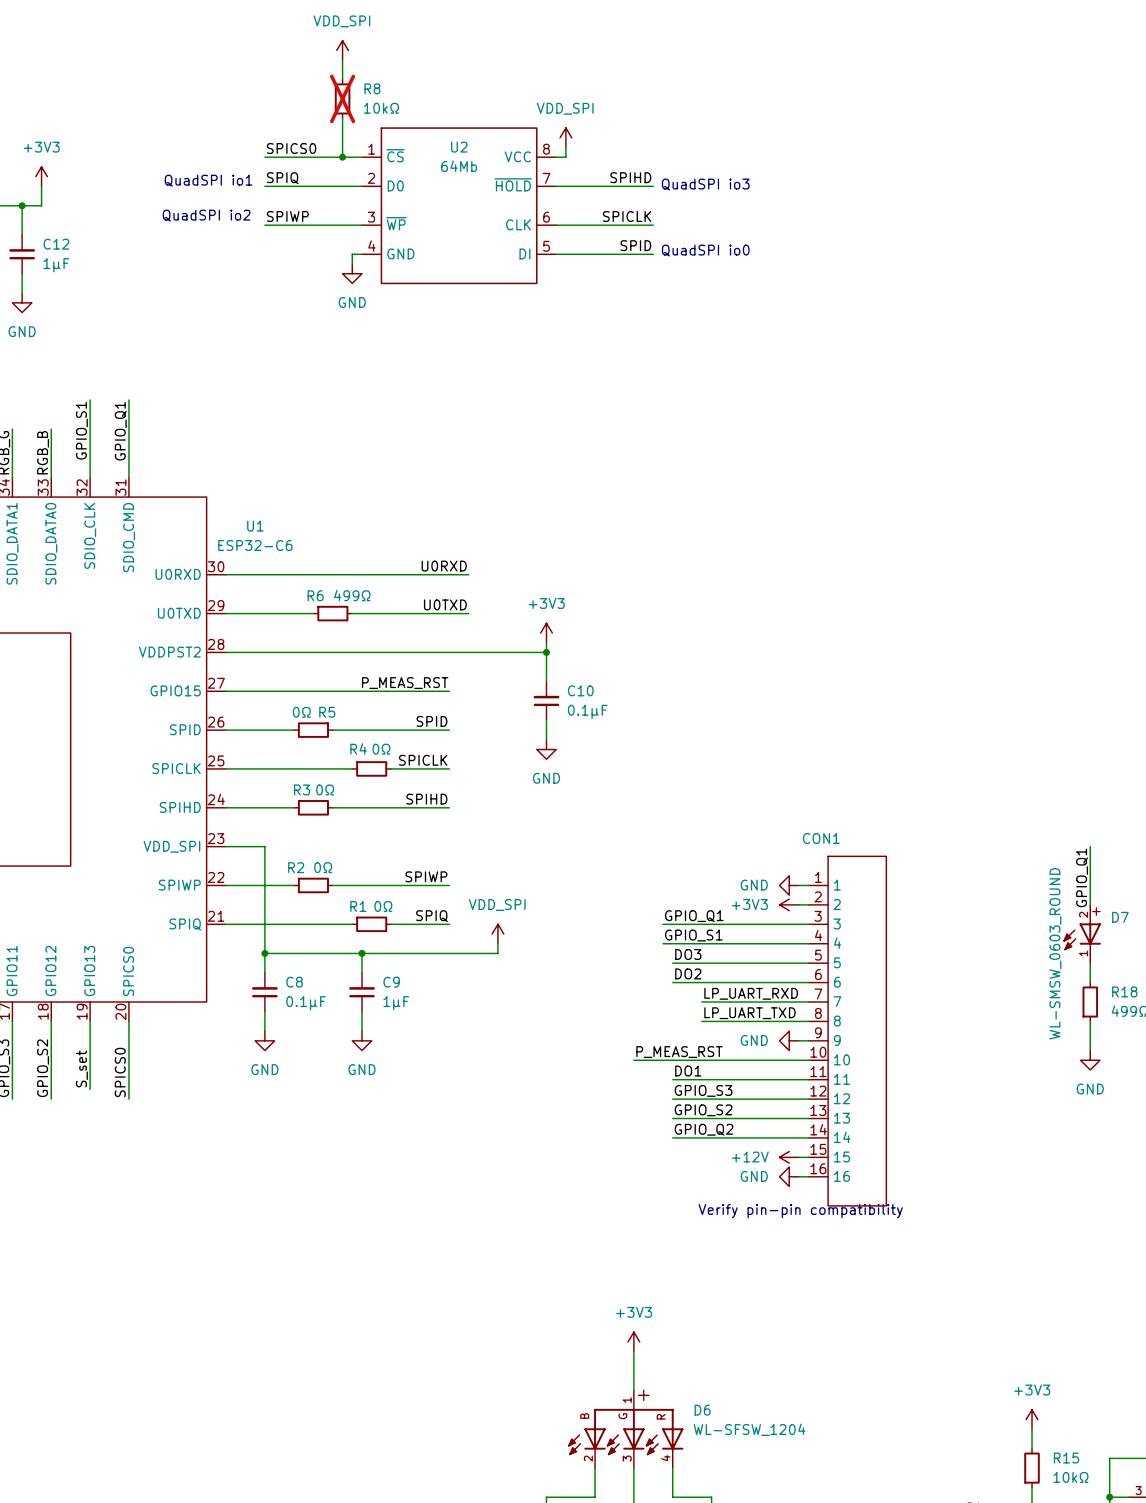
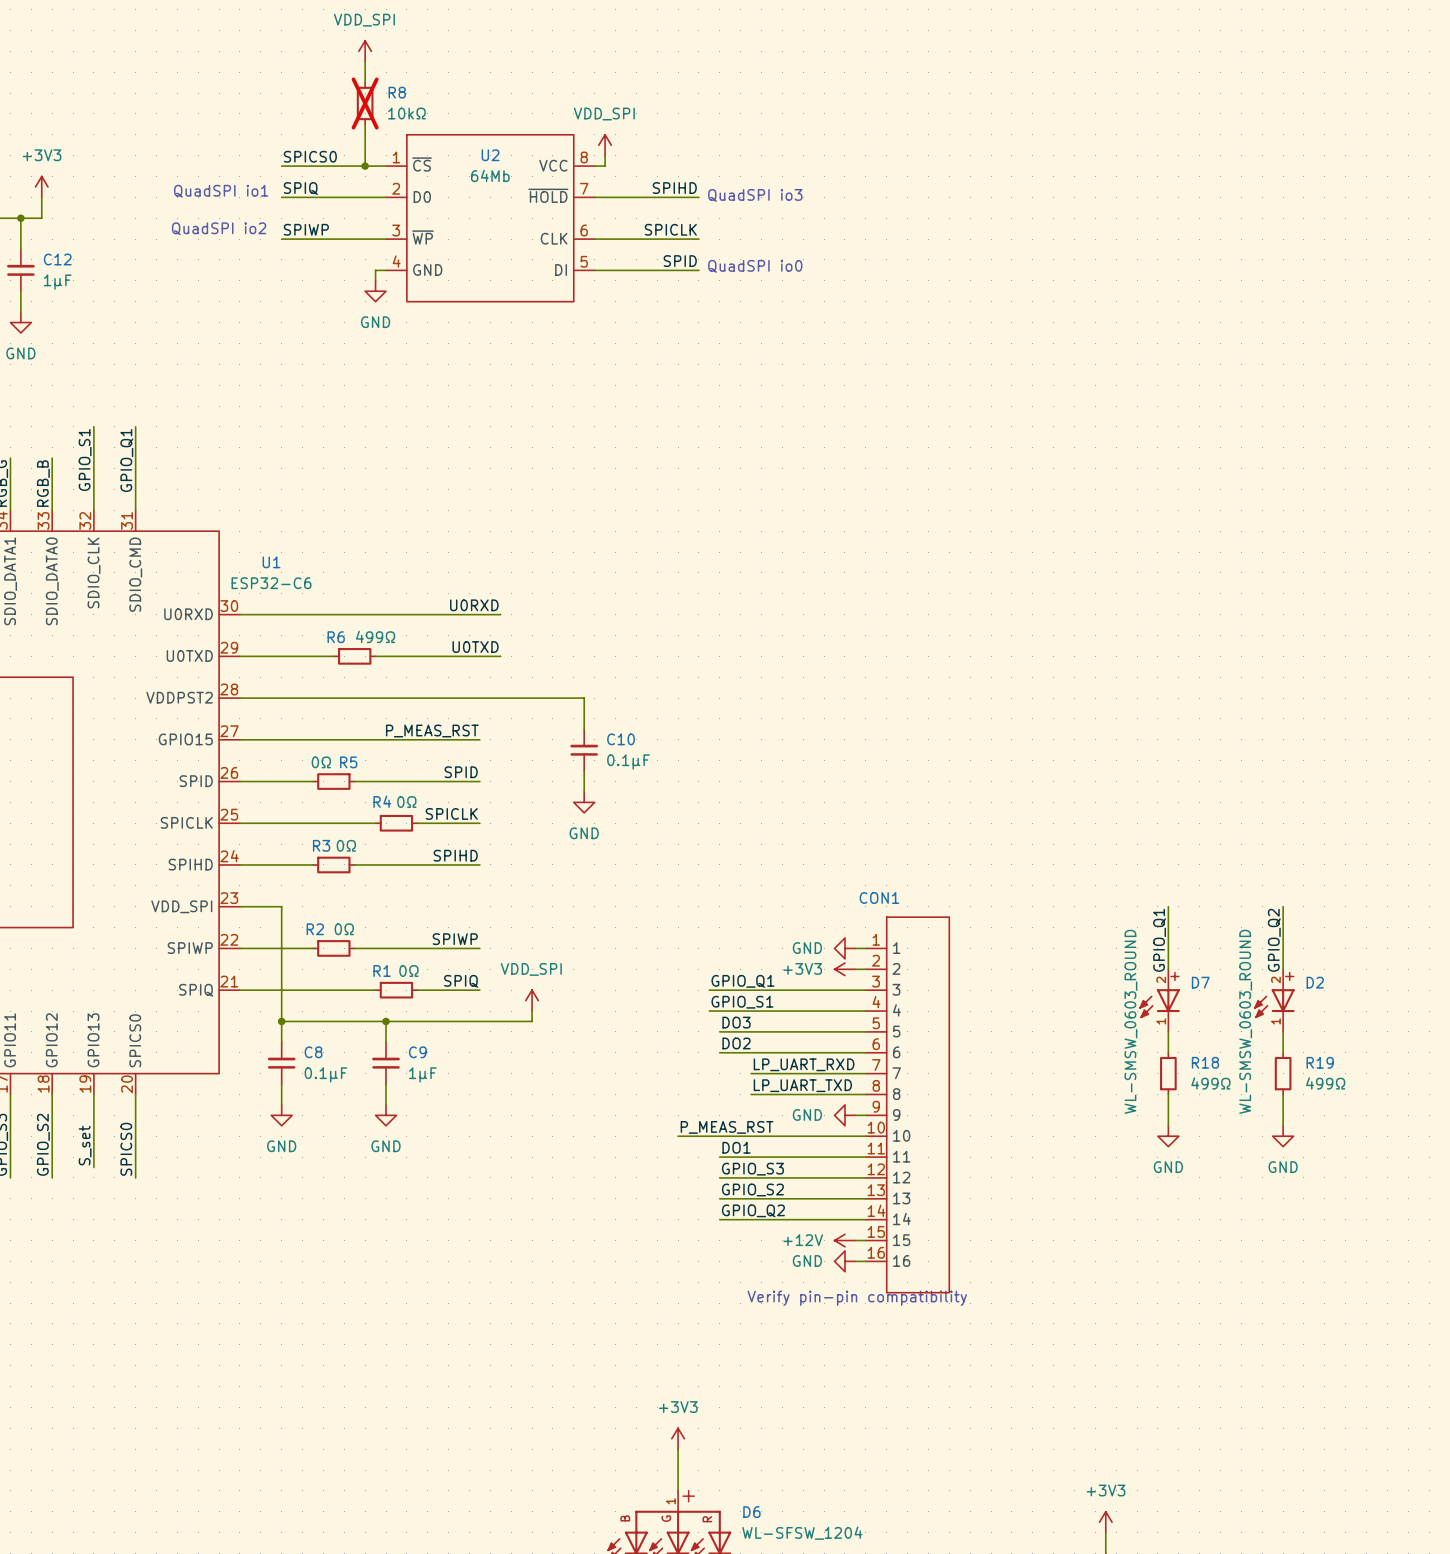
power symbol: +3V3 (546, 633) -> none
wire: (546, 642) (546, 652) -> none
junction: (546, 652) -> none

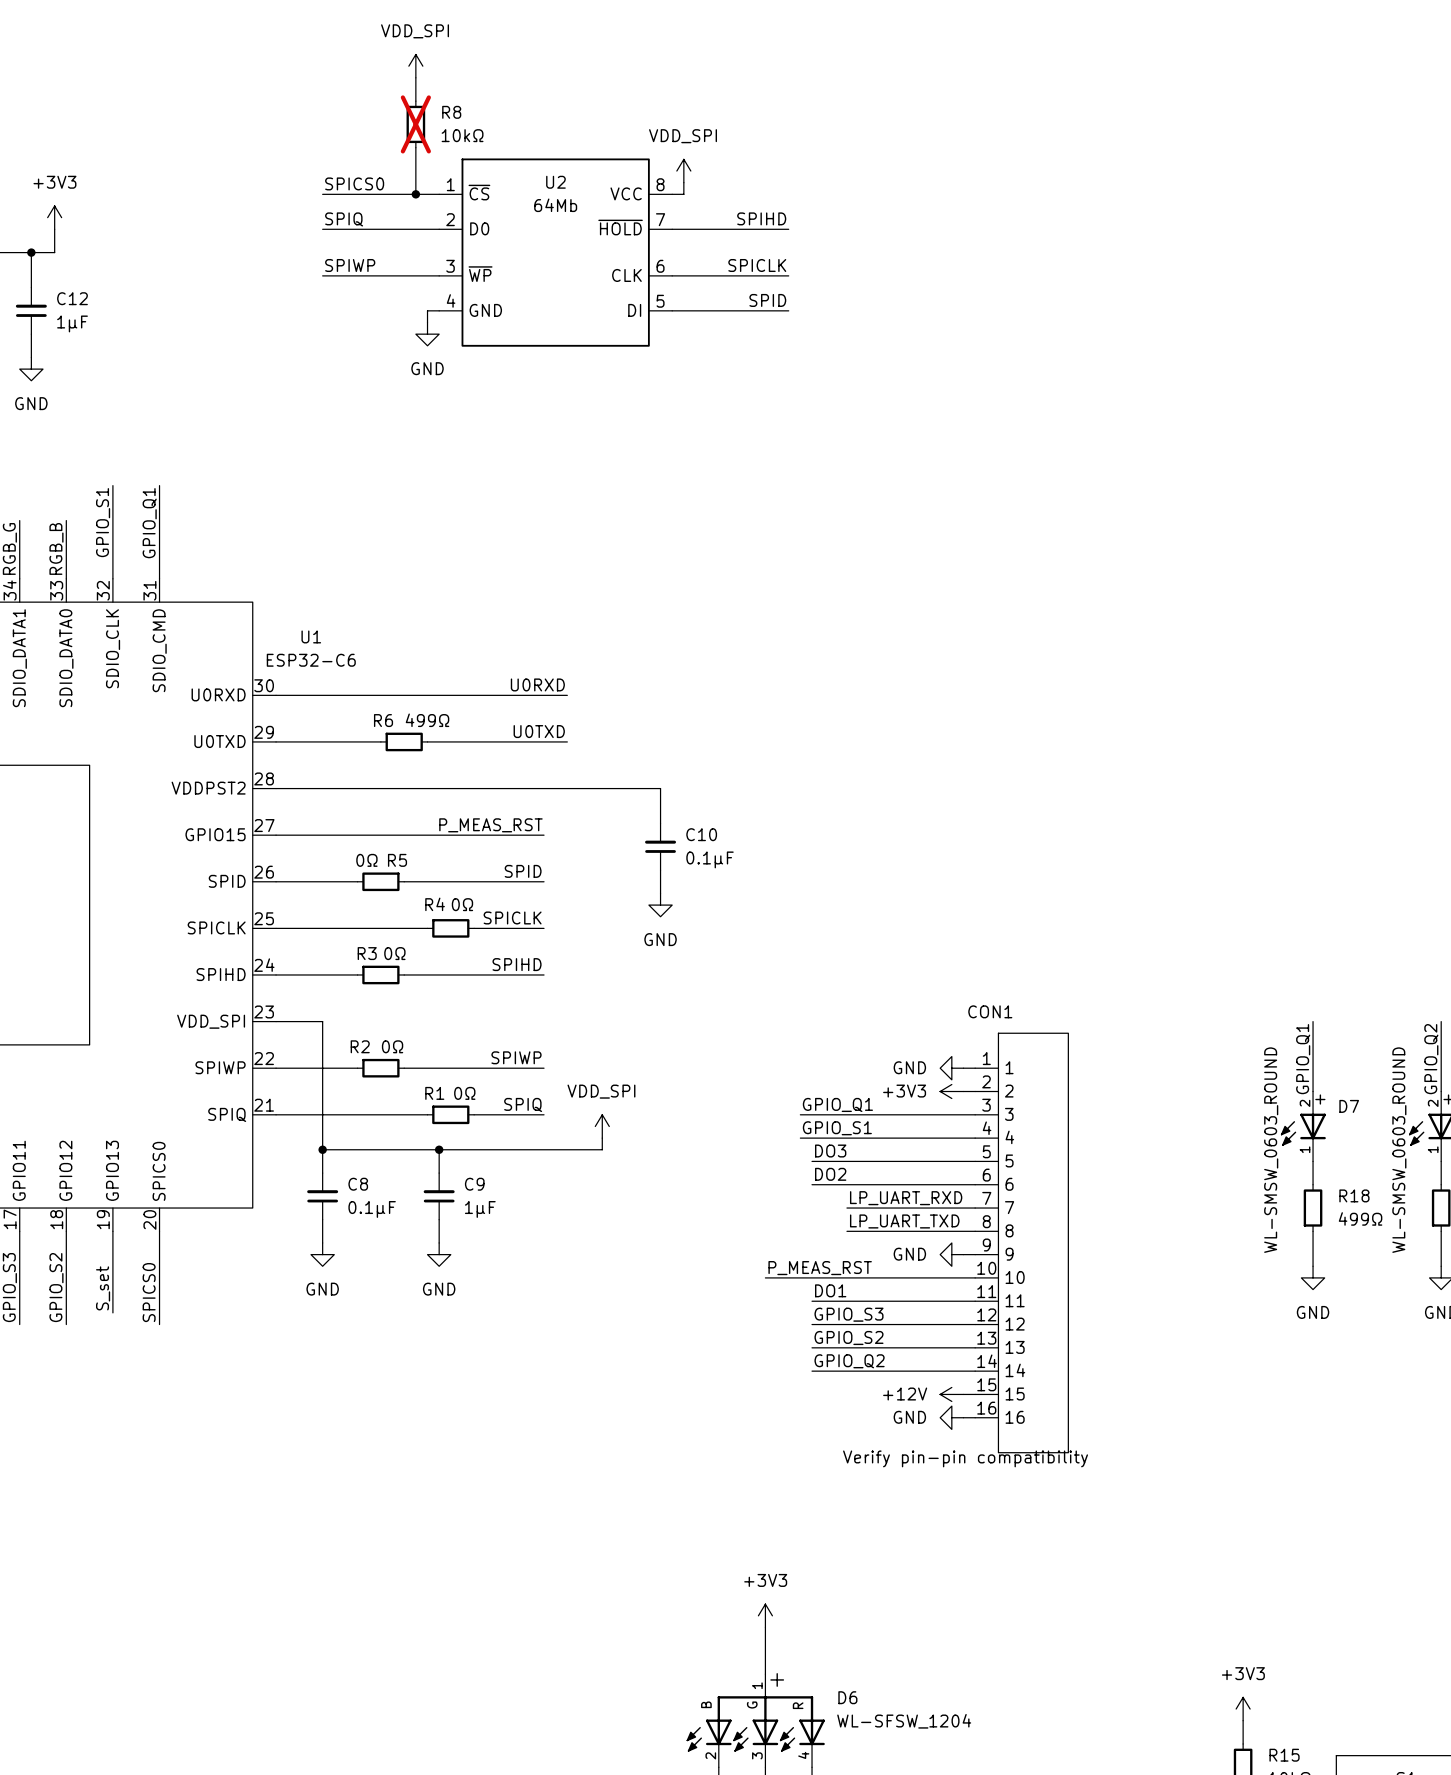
text: QuadSPI io1 (221, 191) -> none
text: QuadSPI io3 (755, 195) -> none
text: QuadSPI io2 (219, 228) -> none
text: QuadSPI io0 (755, 266) -> none

